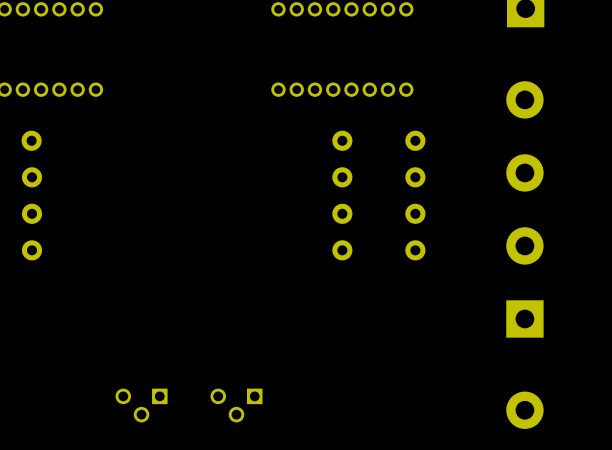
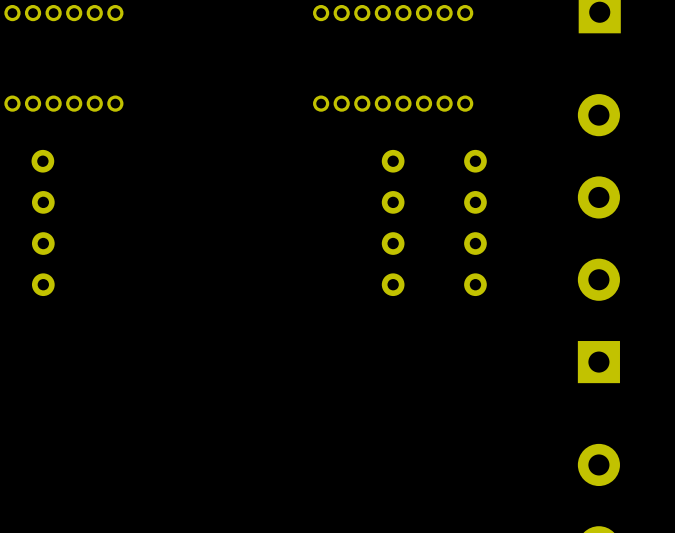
part: (141, 405) -> none
part: (236, 405) -> none

